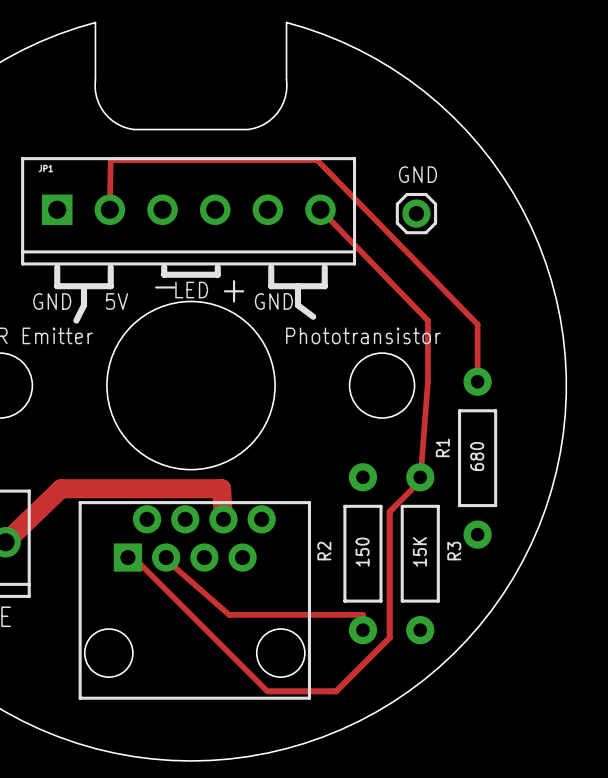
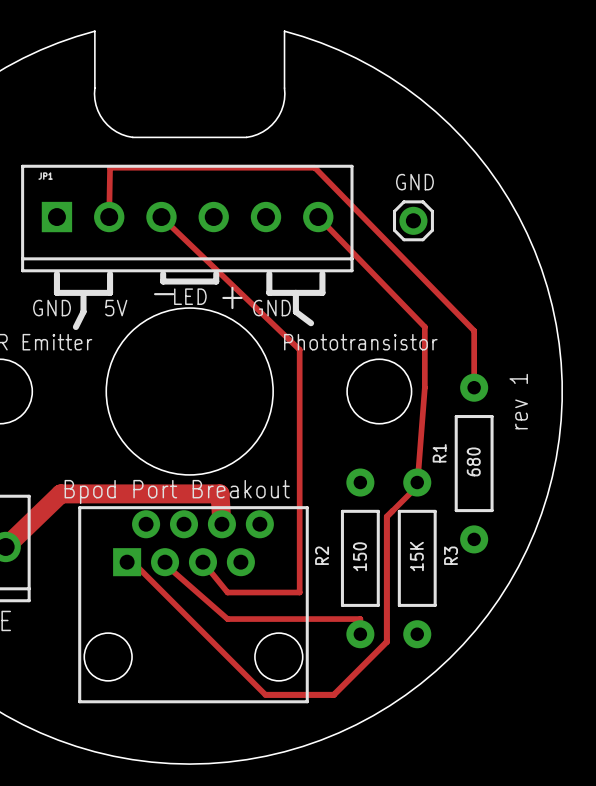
track: none -> (161, 217) (299, 349) (299, 592) (227, 592) (202, 562)
text: none -> rev 1 (518, 401)
text: none -> Bpod Port Breakout (177, 492)

